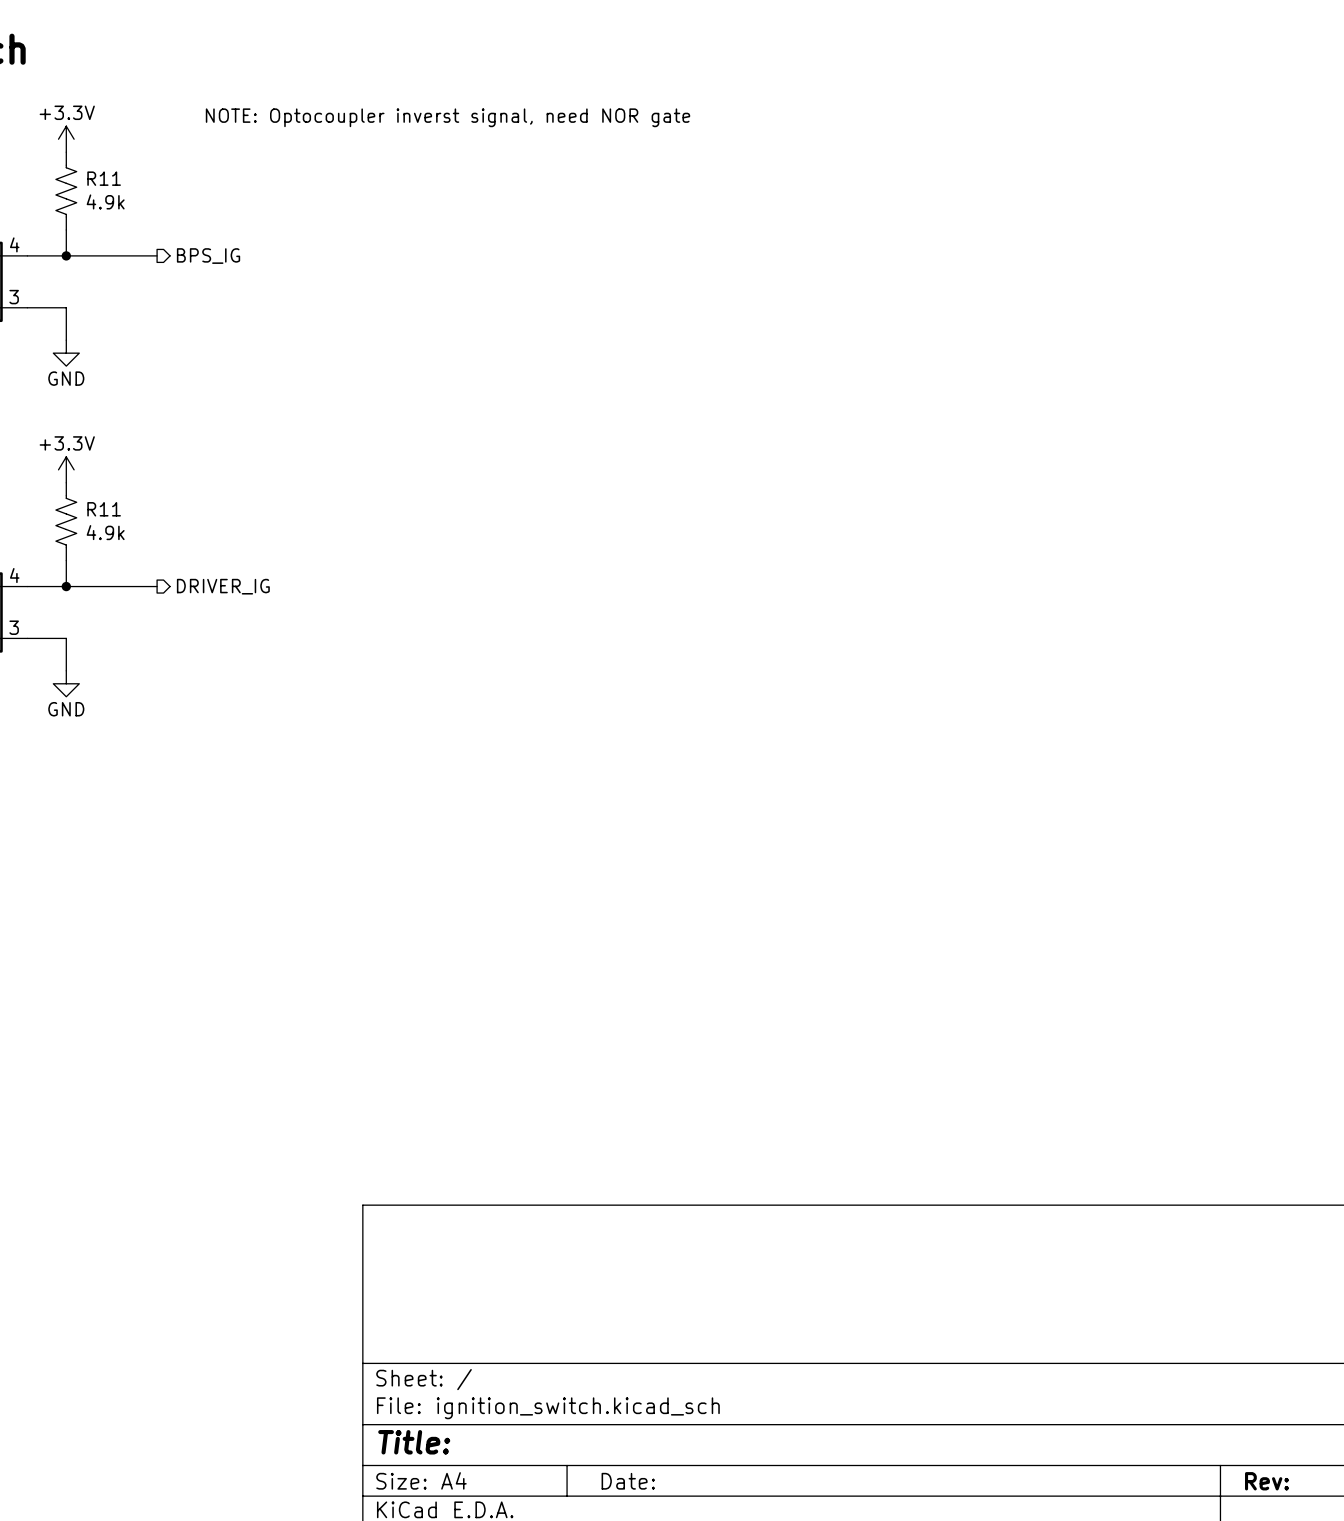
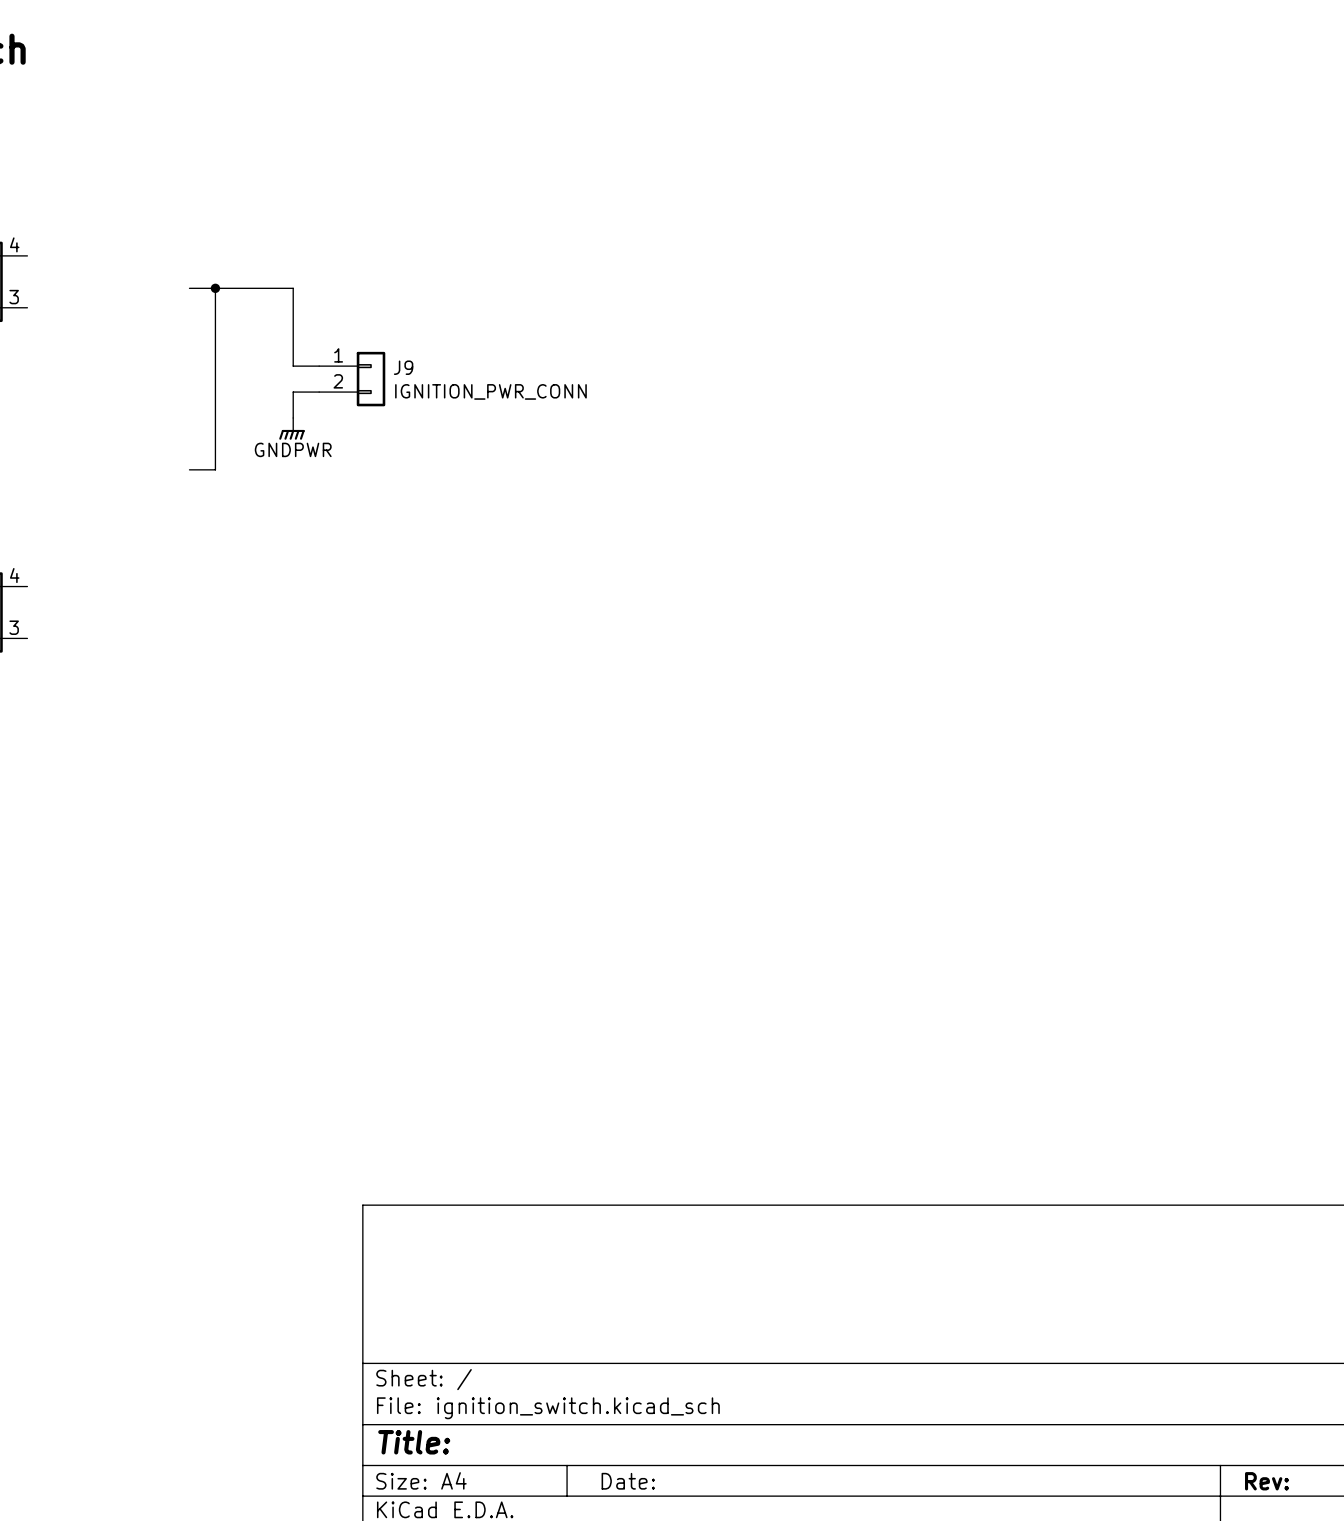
text: NOTE: Optocoupler inverst signal, need NOR gate (447, 117) -> none
power symbol: +3.3V (66, 139) -> none
R11: 4.9k (66, 191) -> none
wire: (66, 229) (66, 255) -> none
wire: (27, 255) (157, 255) -> none
junction: (66, 255) -> none
hierarchical label: BPS_IG (208, 256) -> none
wire: none -> (189, 288) (293, 288) (293, 366) (319, 366)
wire: none -> (215, 288) (215, 469) (189, 469)
junction: none -> (215, 288)
wire: (27, 307) (66, 307) (66, 340) -> none
power symbol: GND (66, 353) -> none
J9: none -> IGNITION_PWR_CONN (352, 379)
wire: none -> (319, 392) (293, 392) (293, 417)
power symbol: none -> GNDPWR (291, 428)
power symbol: +3.3V (66, 469) -> none
R11: 4.9k (66, 521) -> none
wire: (66, 560) (66, 586) -> none
wire: (27, 586) (157, 586) -> none
junction: (66, 586) -> none
hierarchical label: DRIVER_IG (223, 586) -> none
wire: (27, 638) (66, 638) (66, 670) -> none
power symbol: GND (66, 683) -> none

